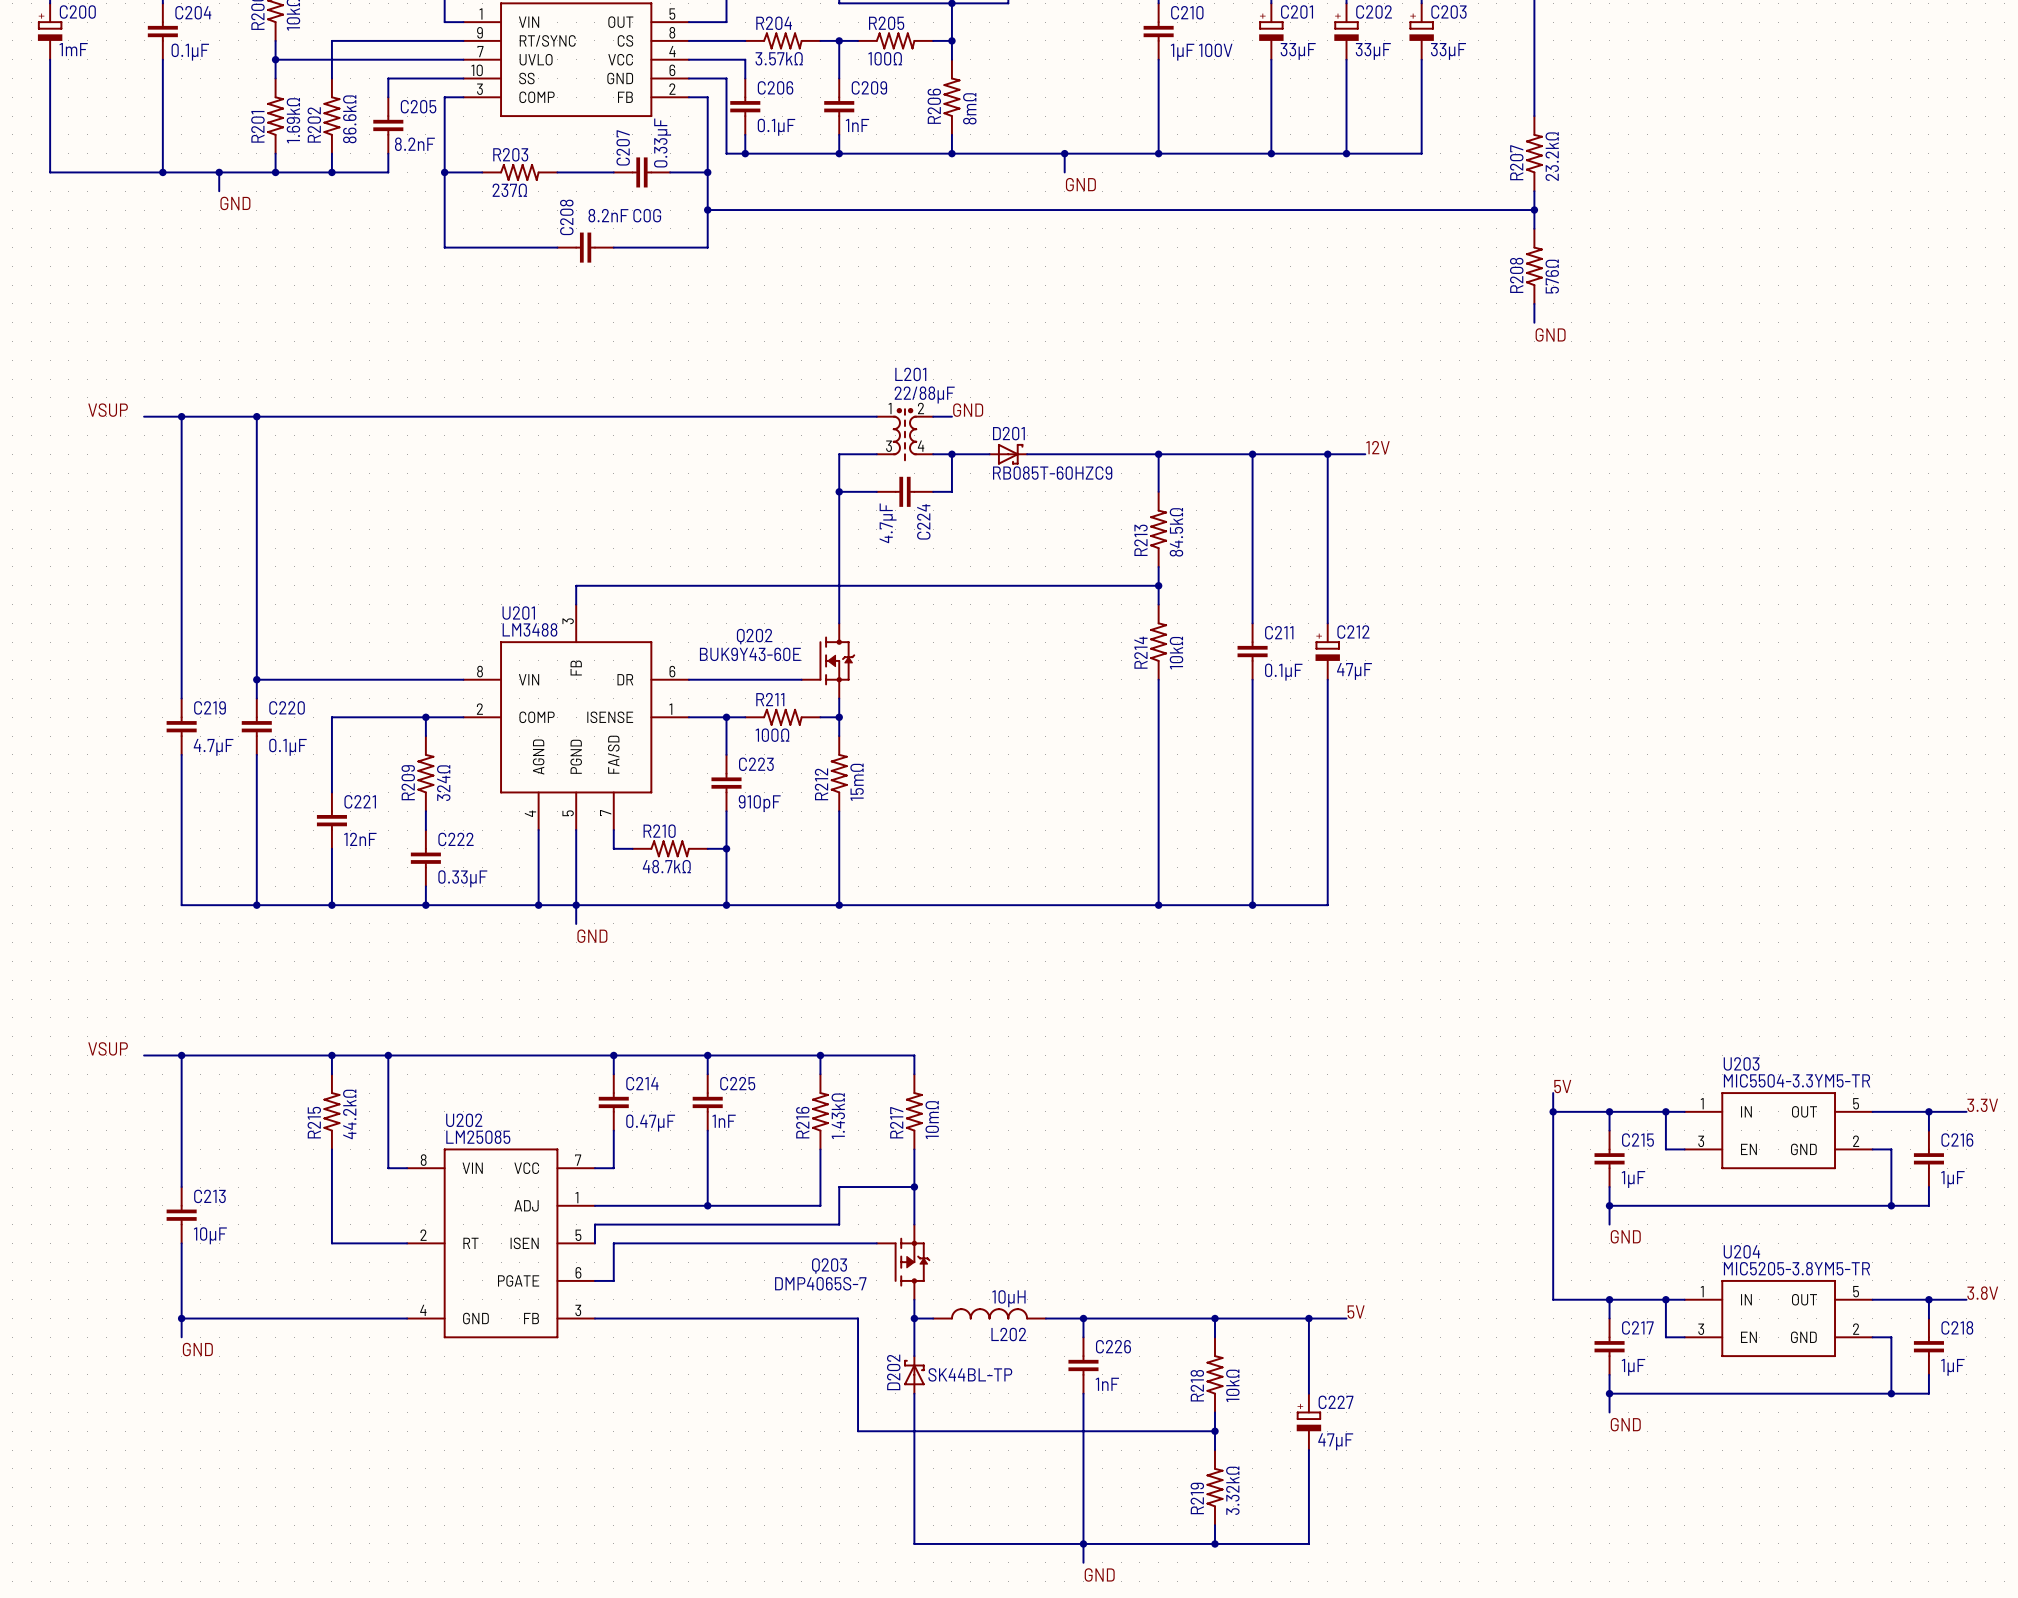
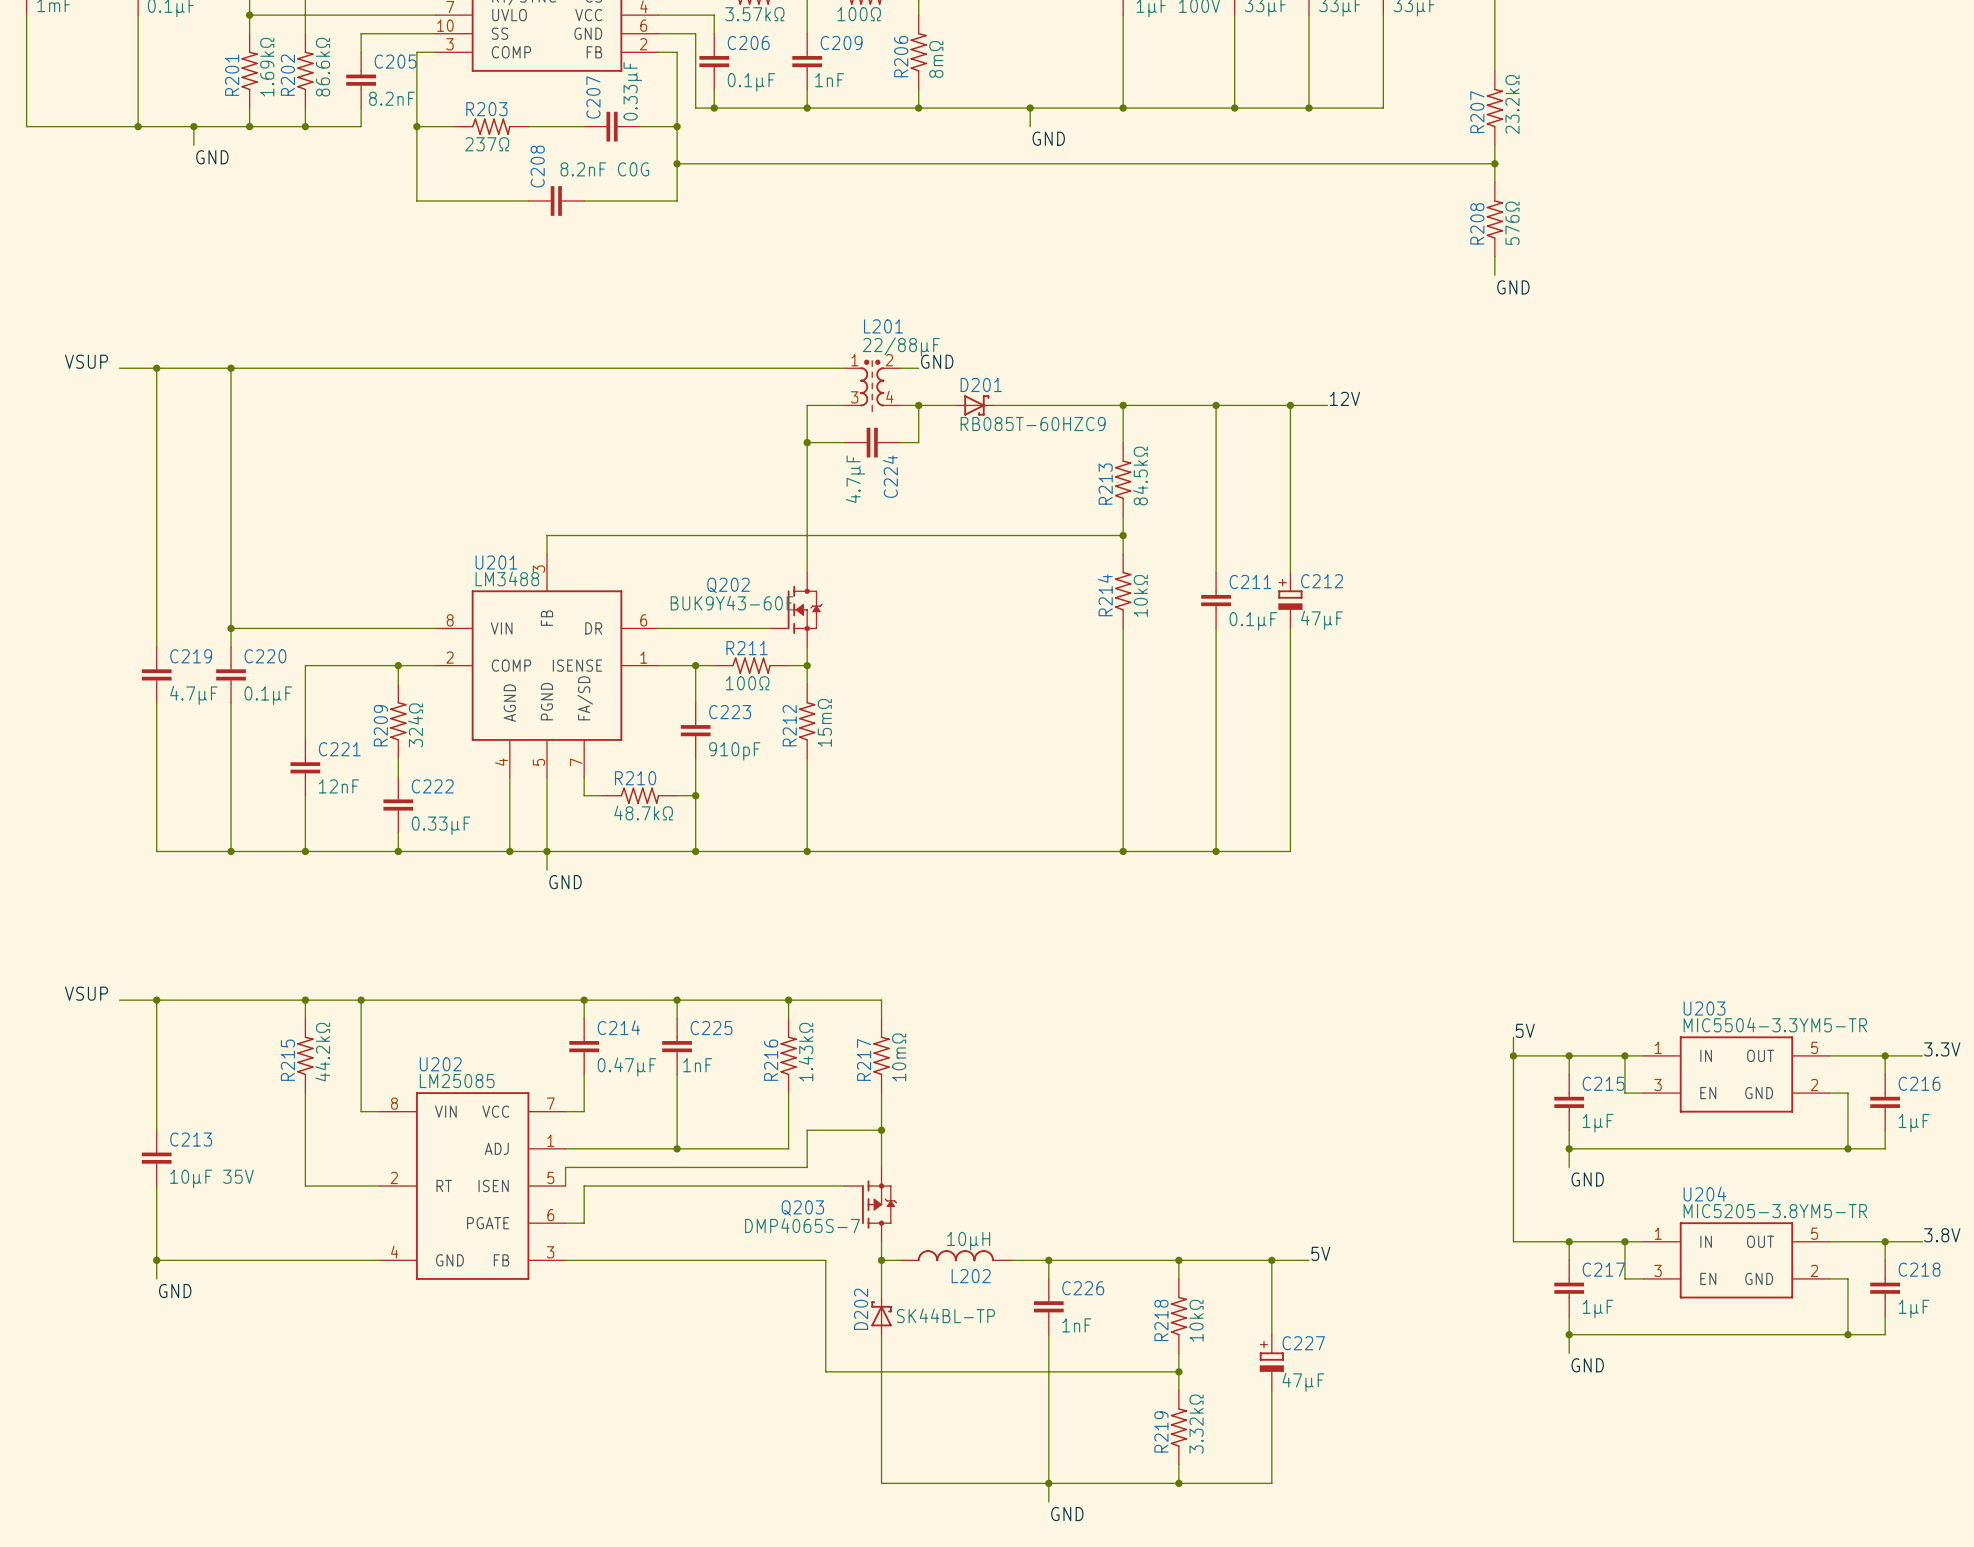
C213 value: 10µF (210, 1235) -> 10µF 35V (212, 1178)

